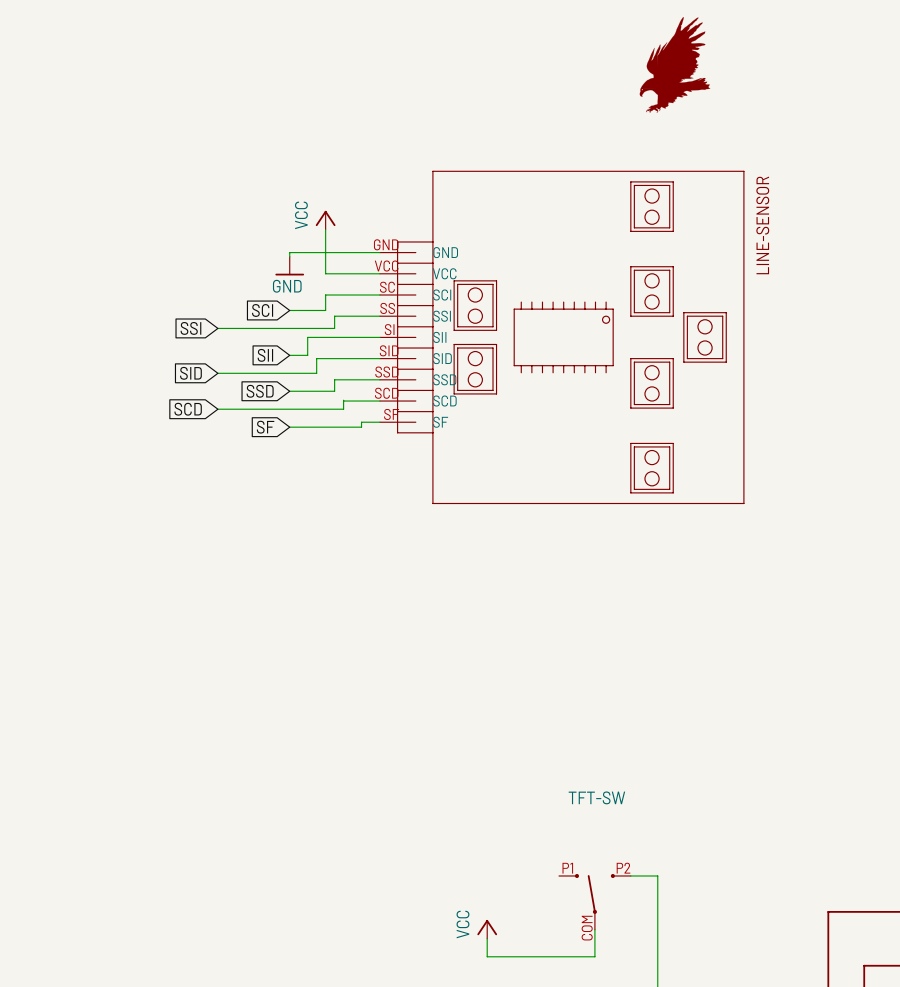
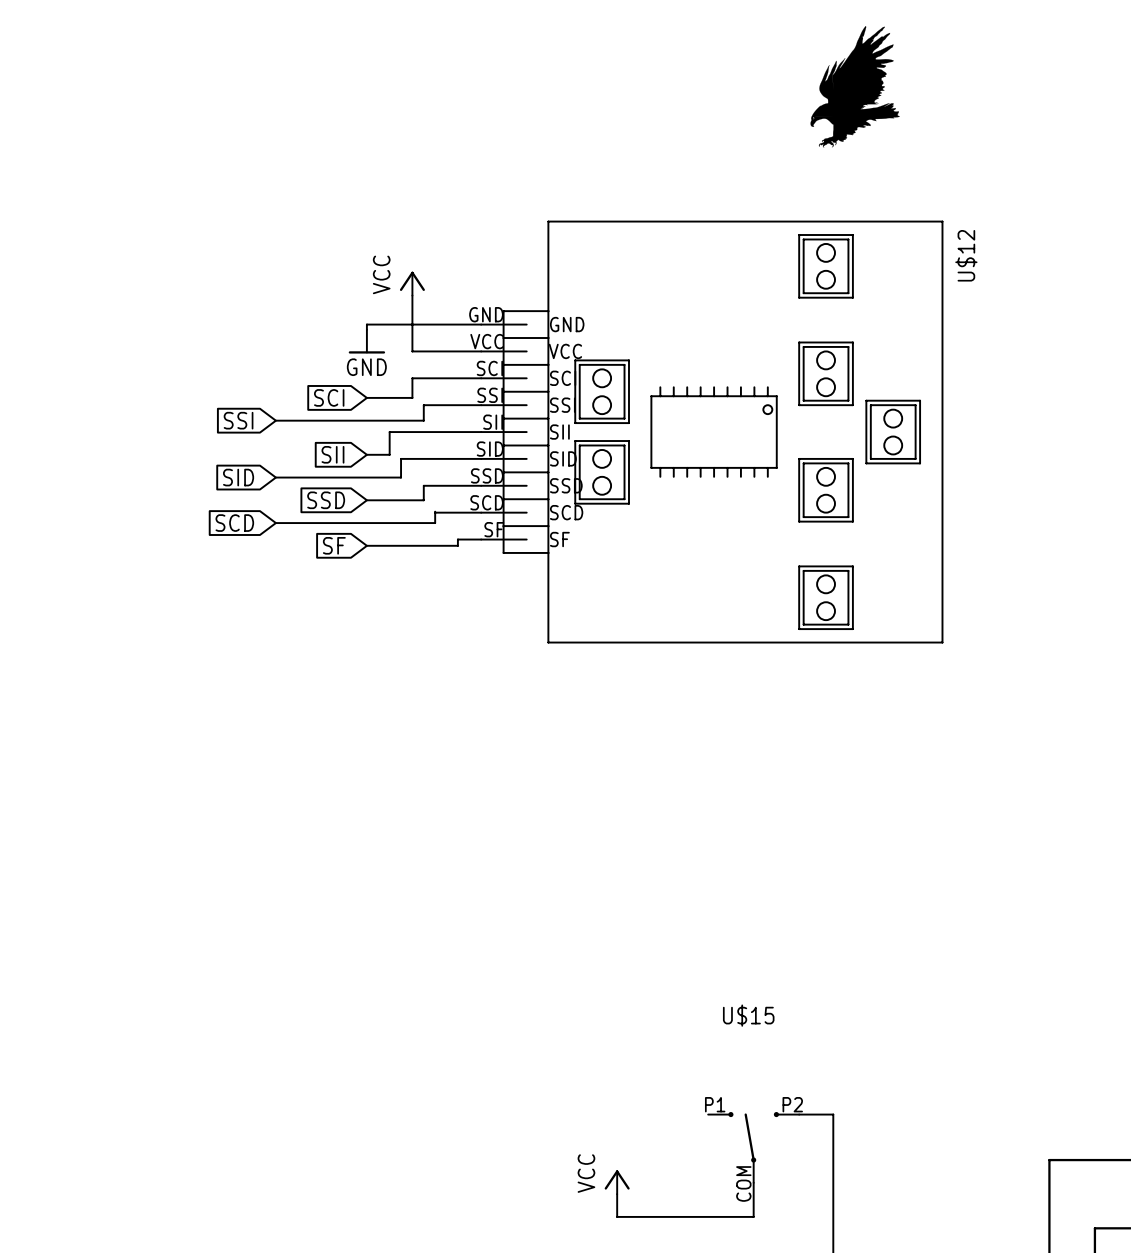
LINE-SENSOR name: LINE-SENSOR (762, 225) -> U$12 (966, 255)
TFT-SW name: TFT-SW (596, 797) -> U$15 (748, 1015)

